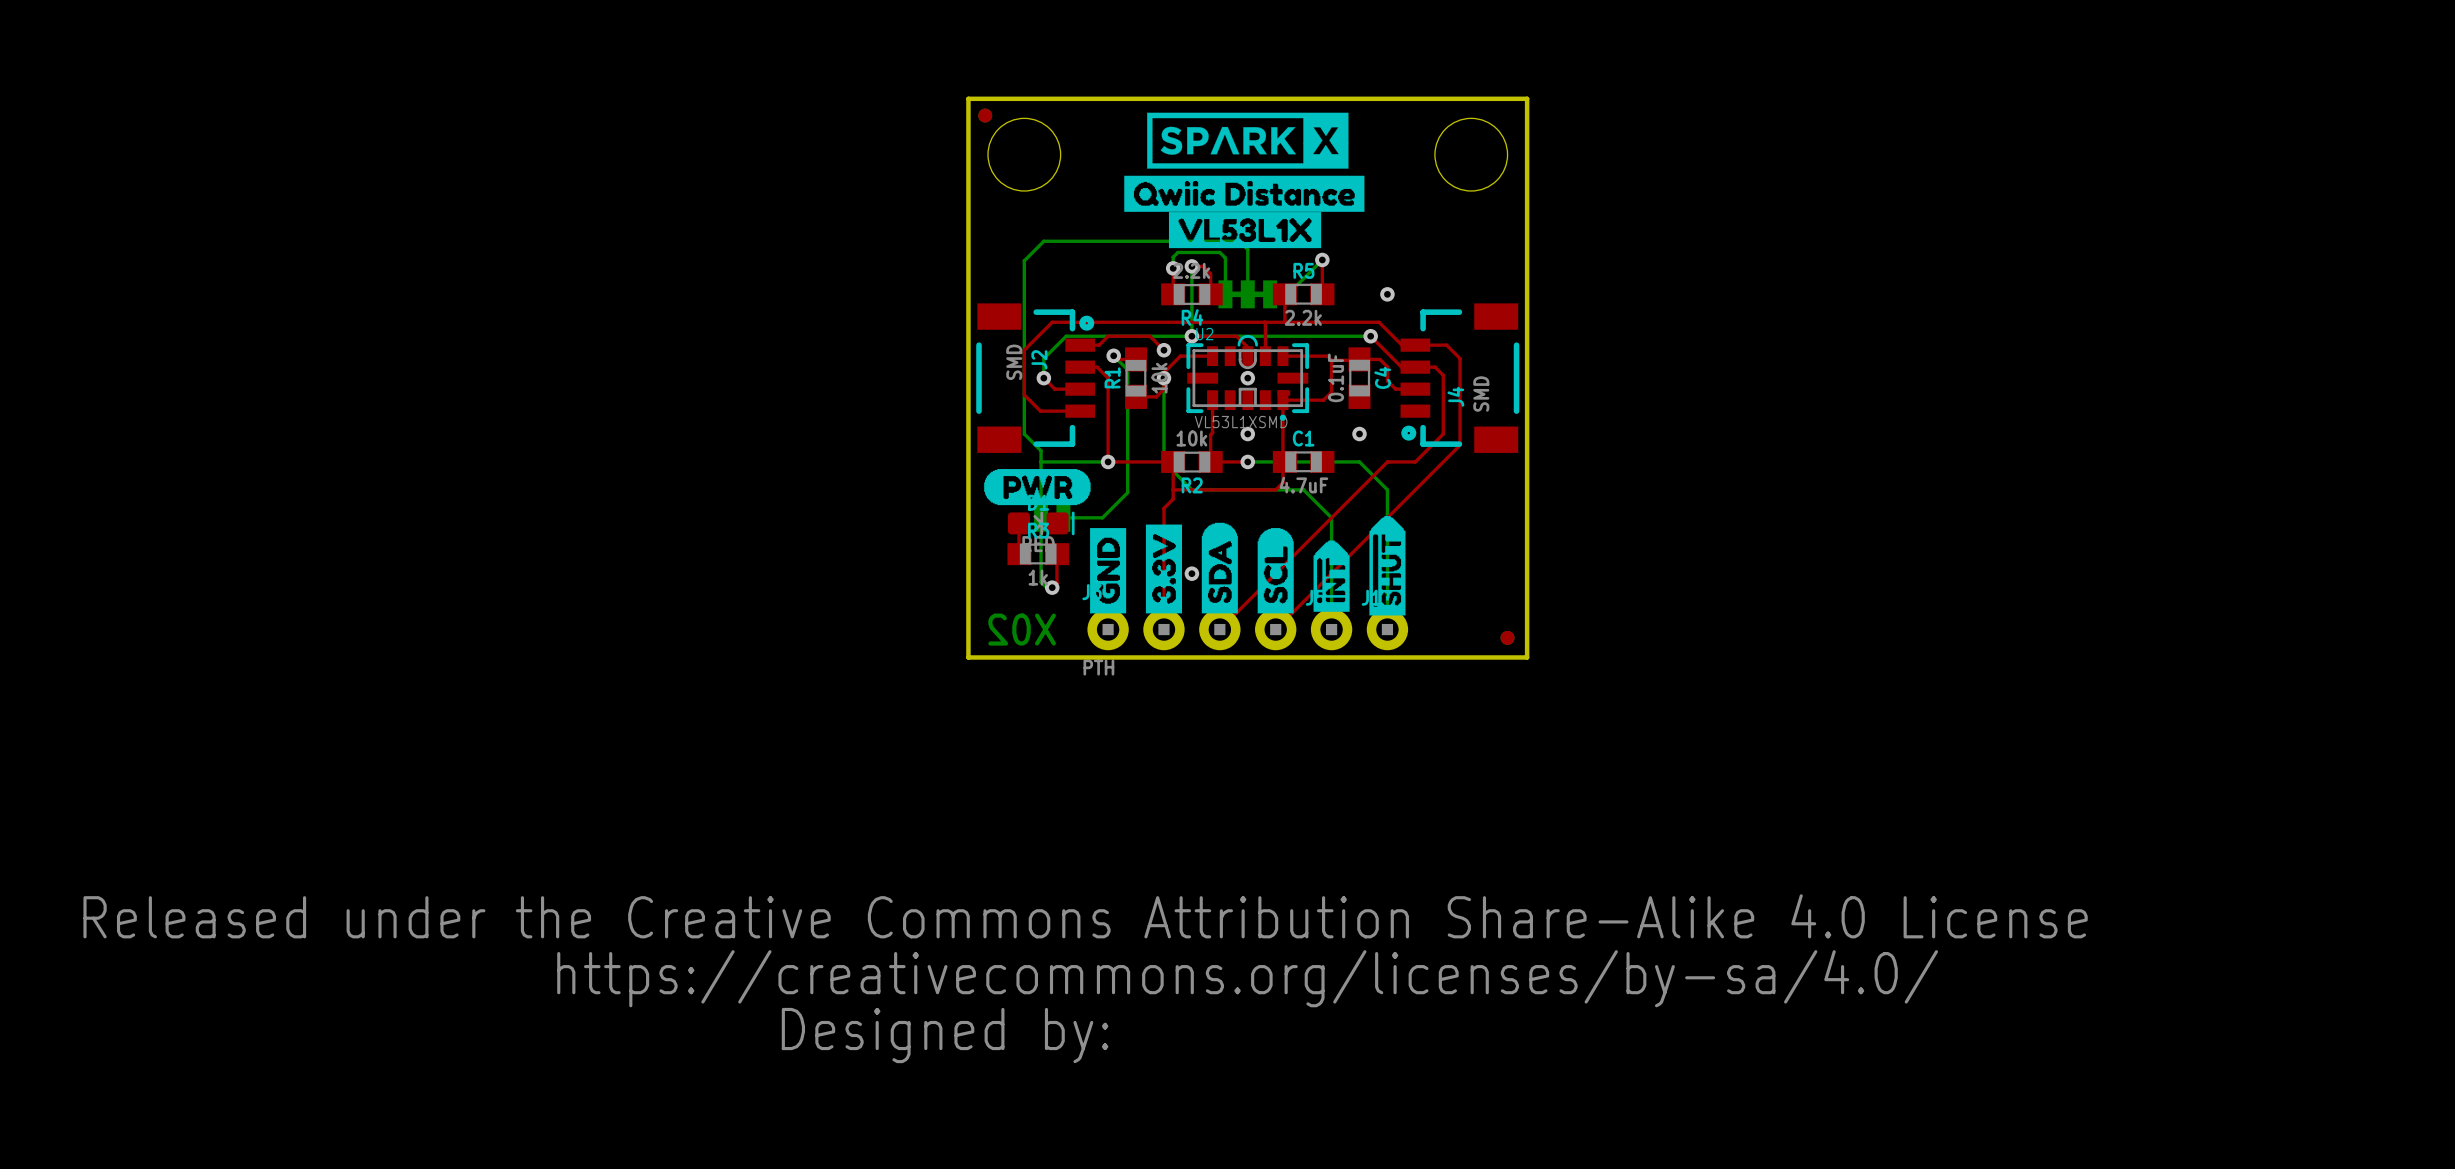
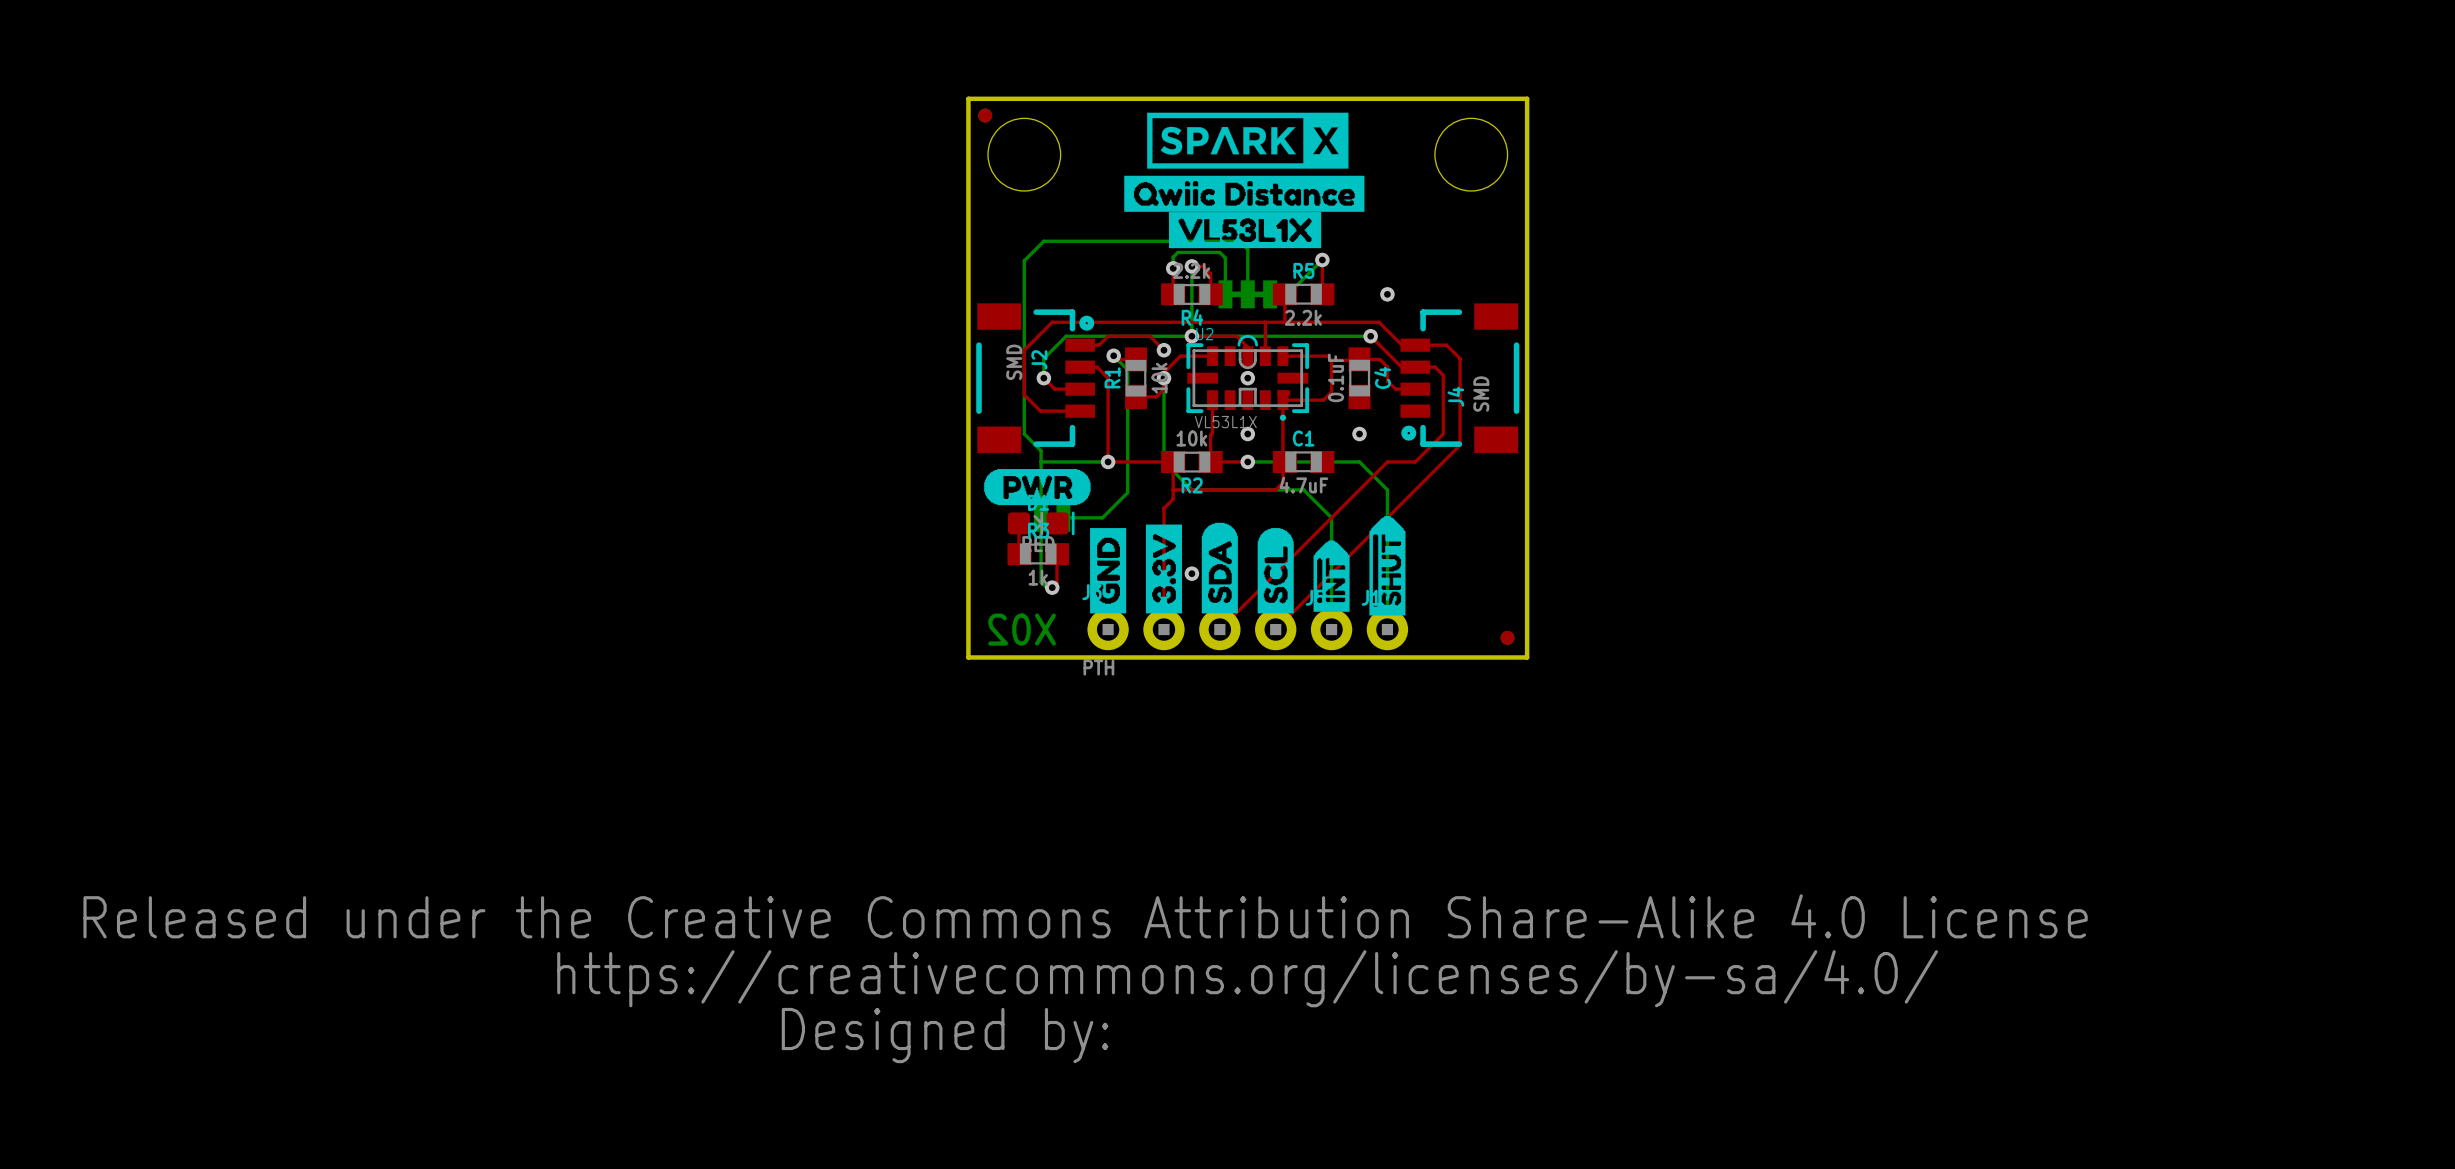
U2 value: VL53L1XSMD (1241, 422) -> VL53L1X (1225, 422)

